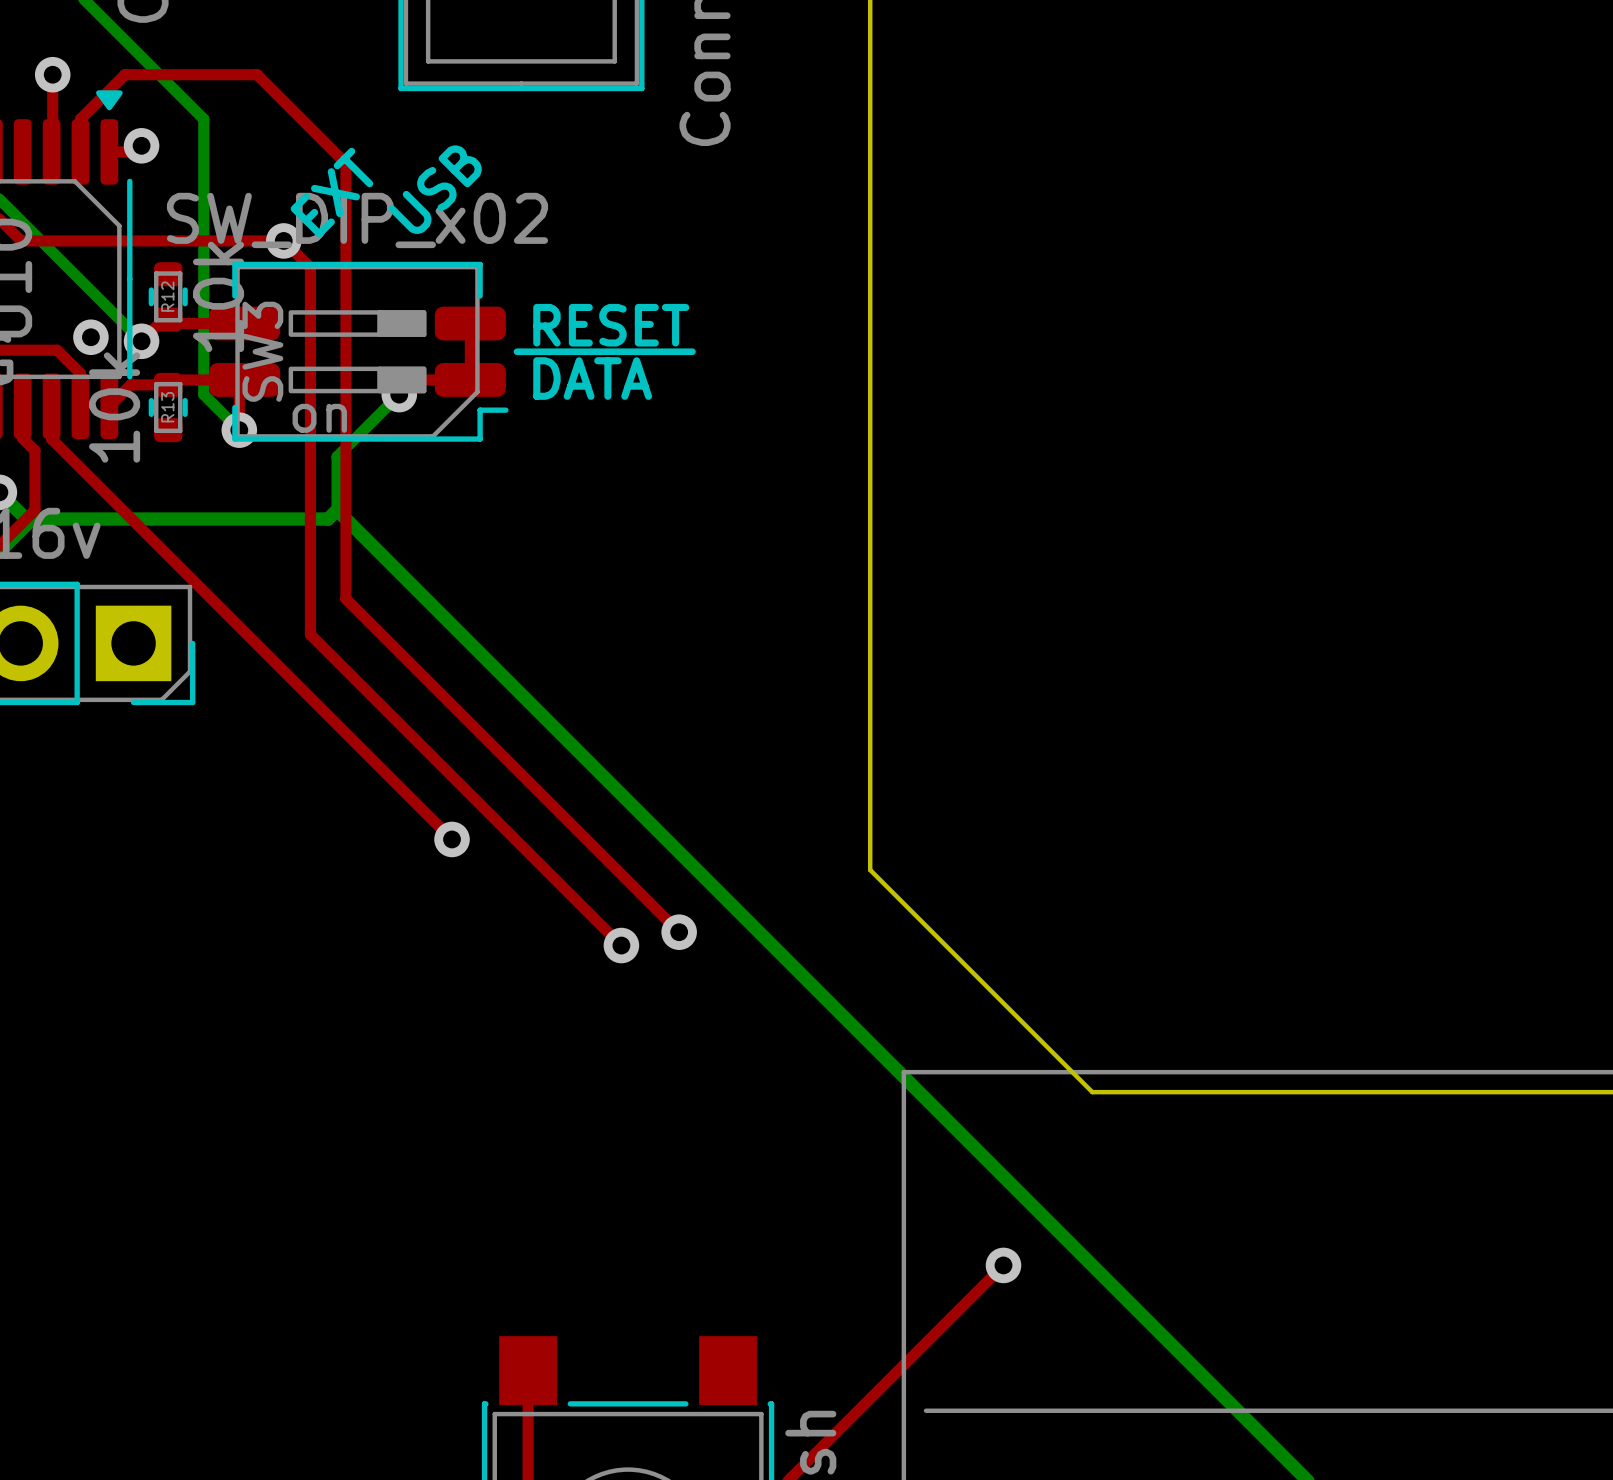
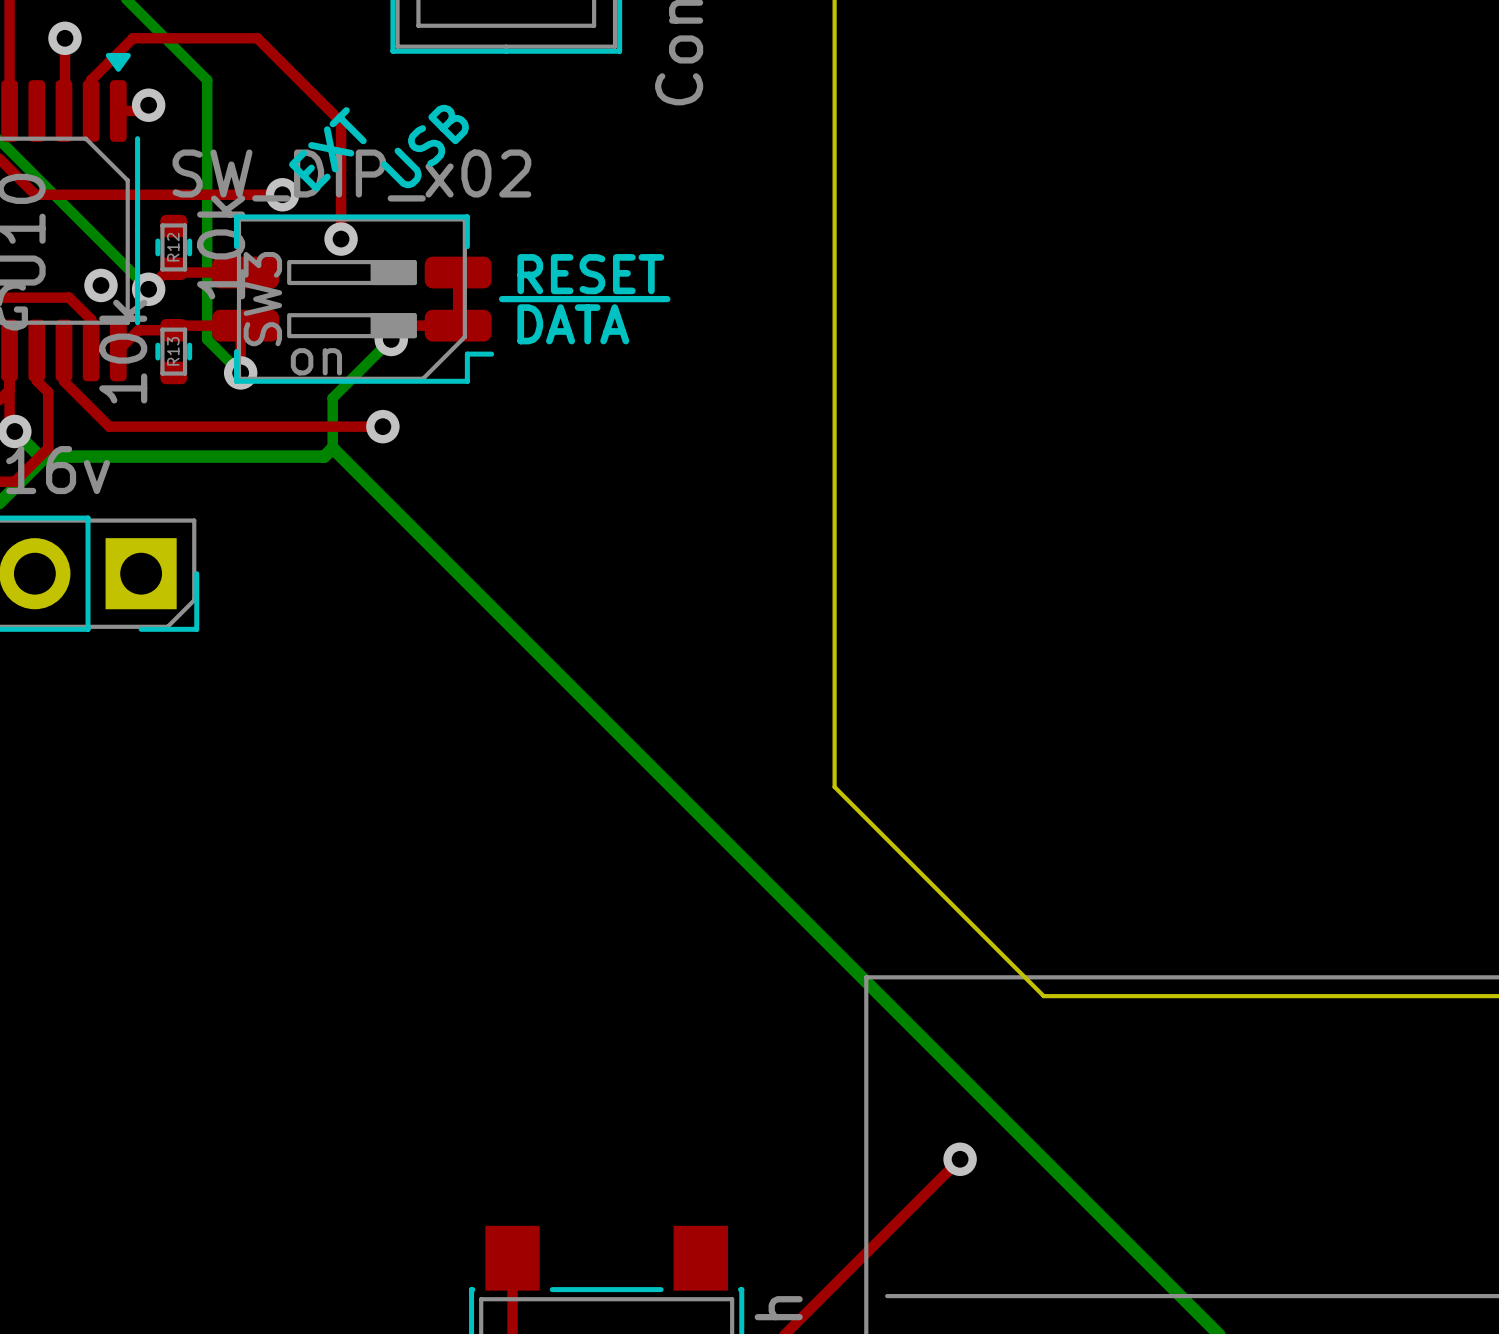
top track: (283, 240) (310, 267) (310, 634) (621, 945) -> none
top track: (345, 287) (345, 598) (679, 932) -> none
via: none -> (341, 239)
top track: (99, 487) (452, 839) -> (109, 426) (382, 426)
via: none -> (382, 426)
via: (452, 839) -> none
via: (679, 932) -> none
via: (621, 945) -> none

